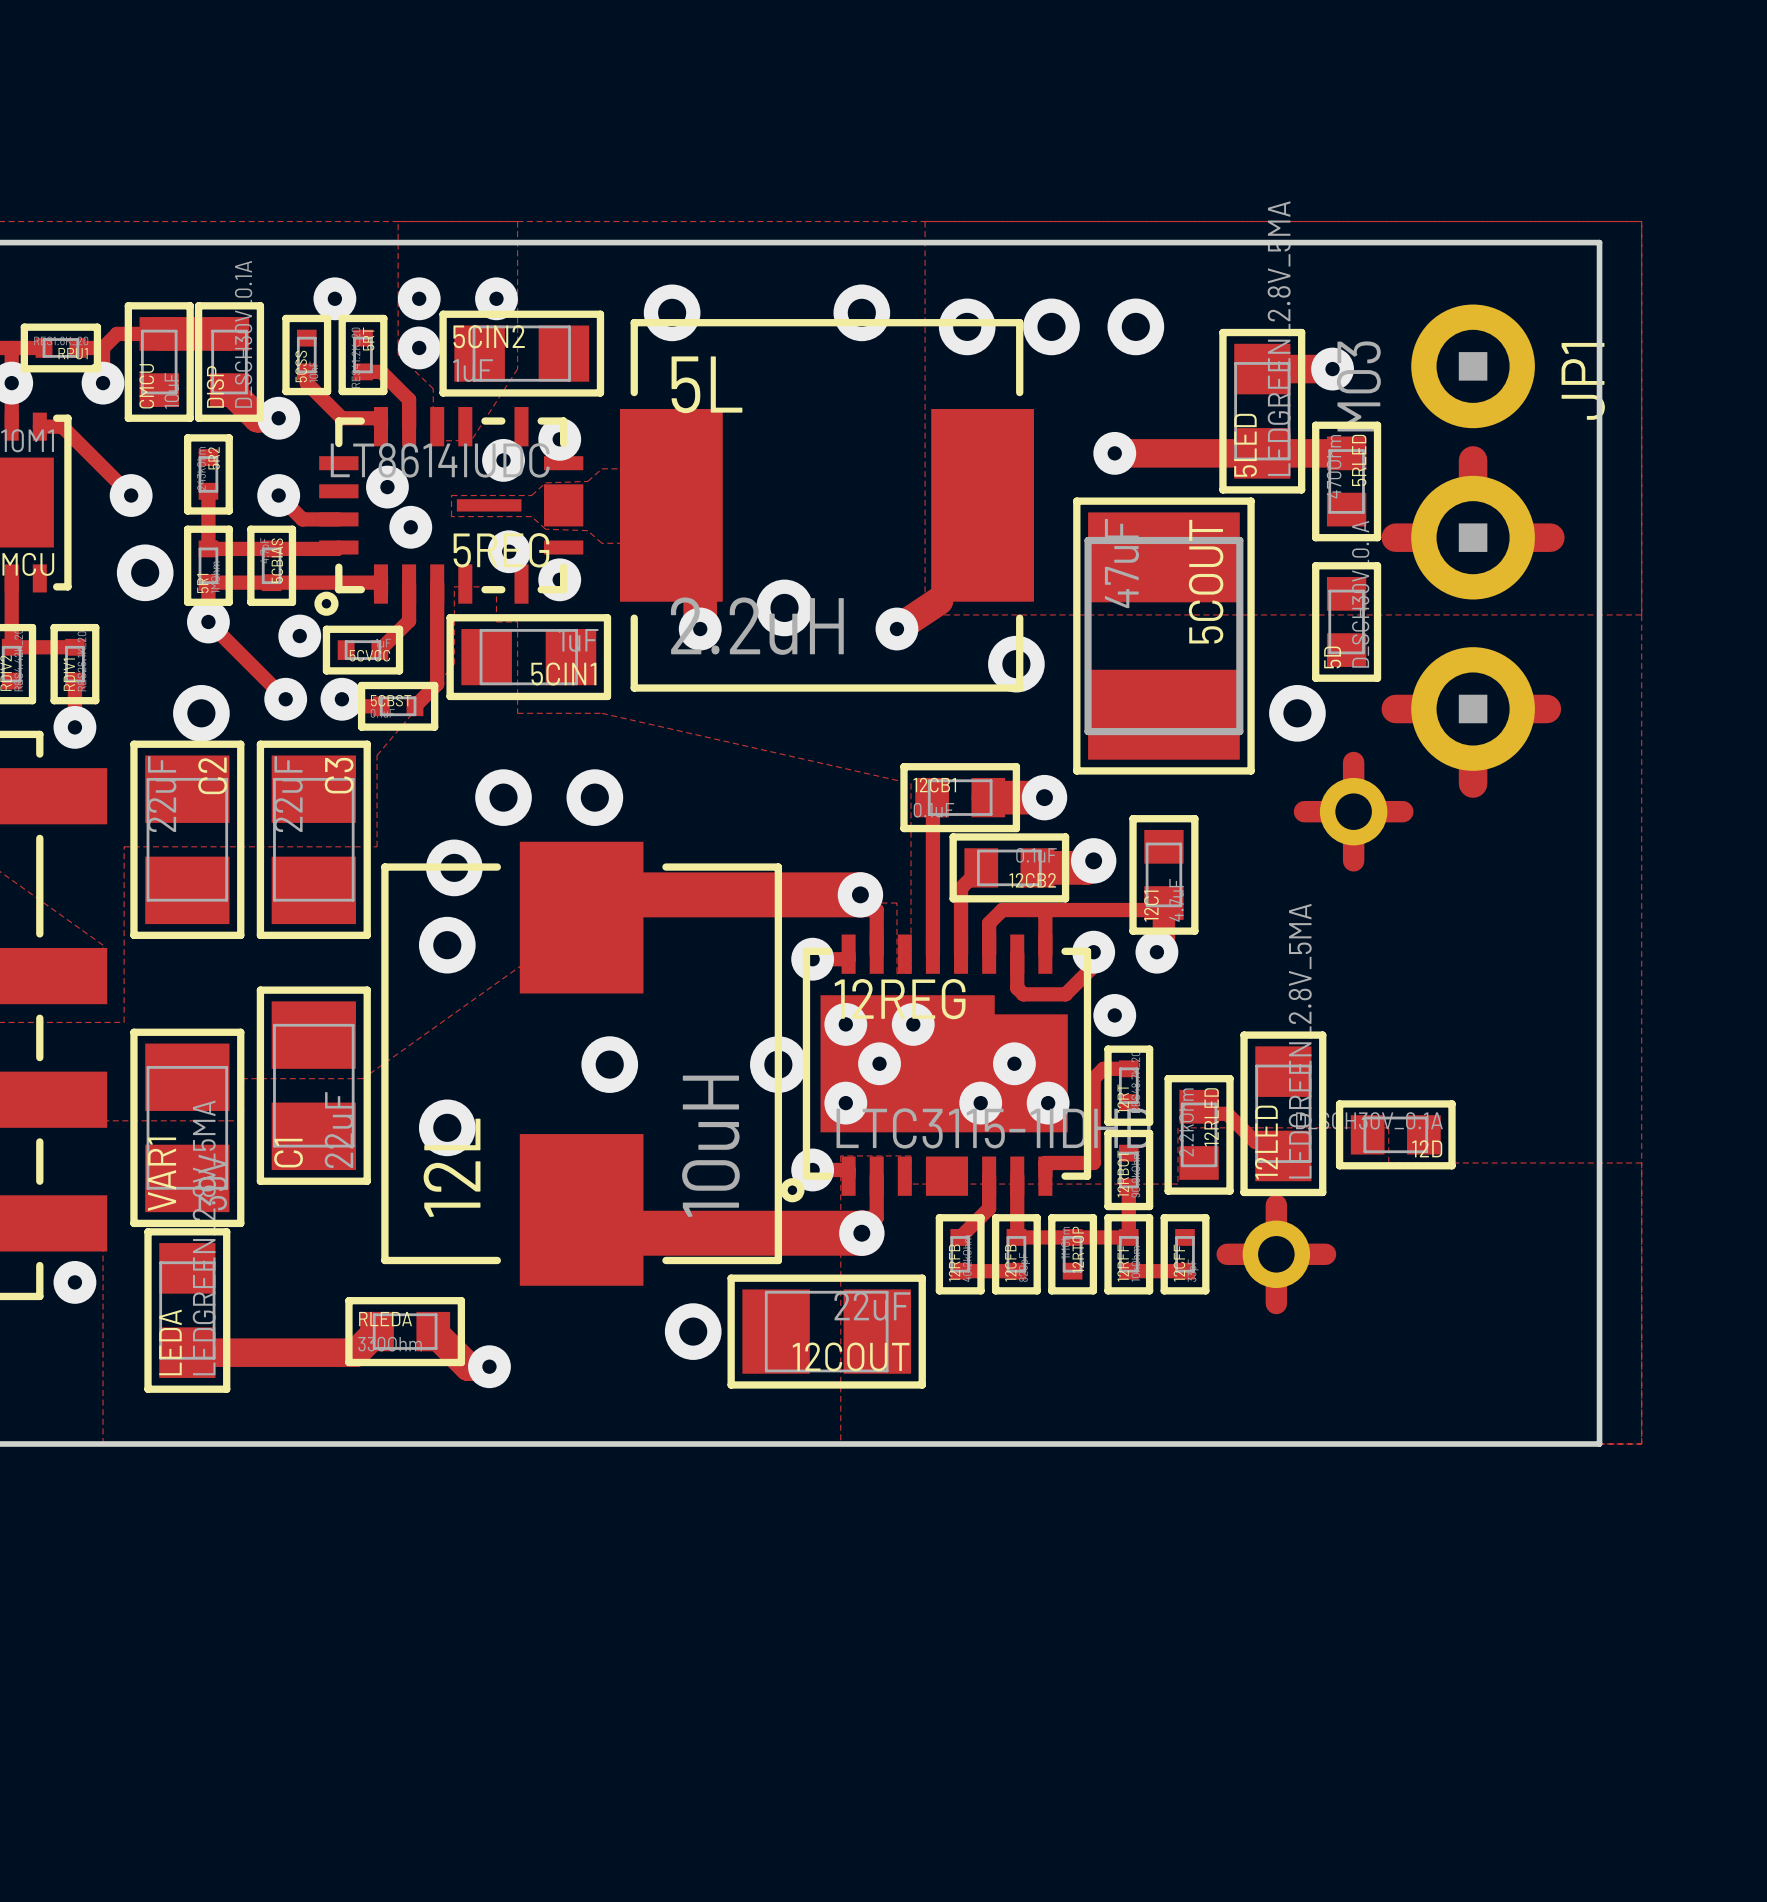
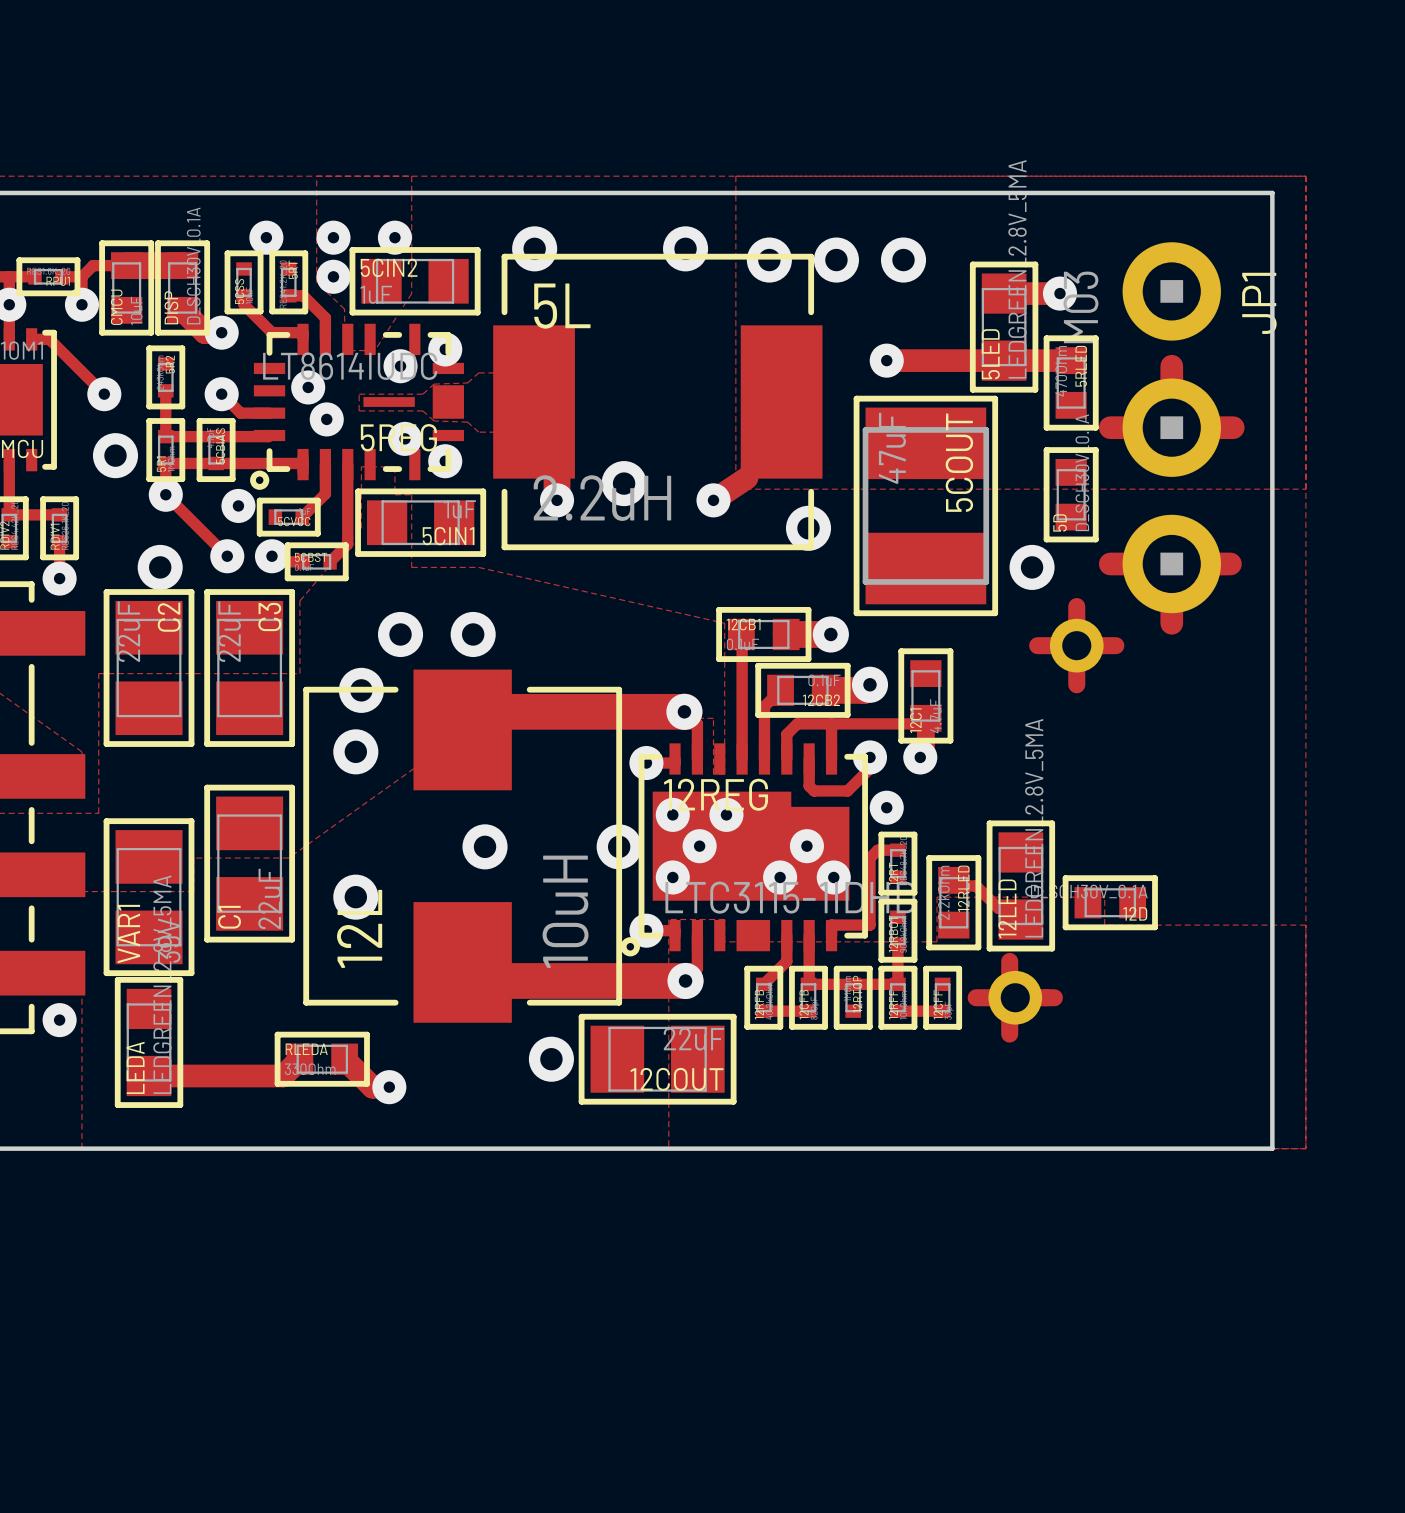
track: (1276, 1205) (1276, 1303) -> none
track: none -> (1009, 961) (1009, 1034)

